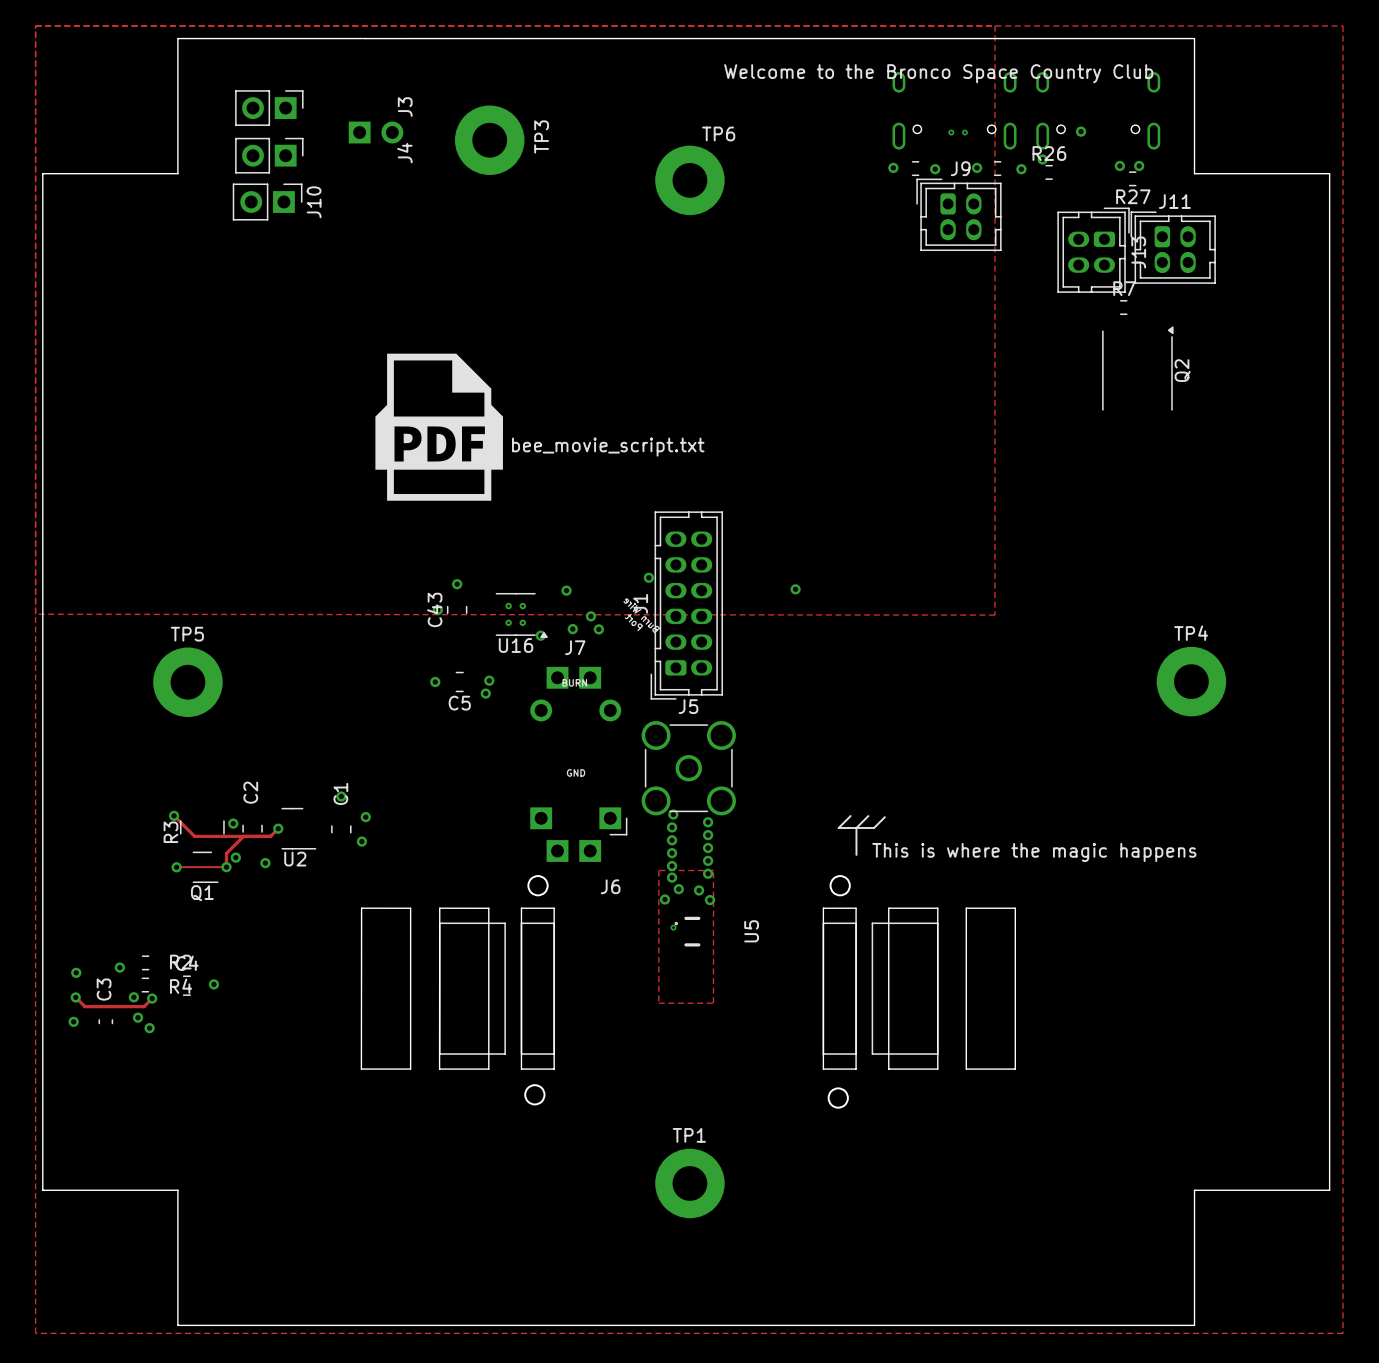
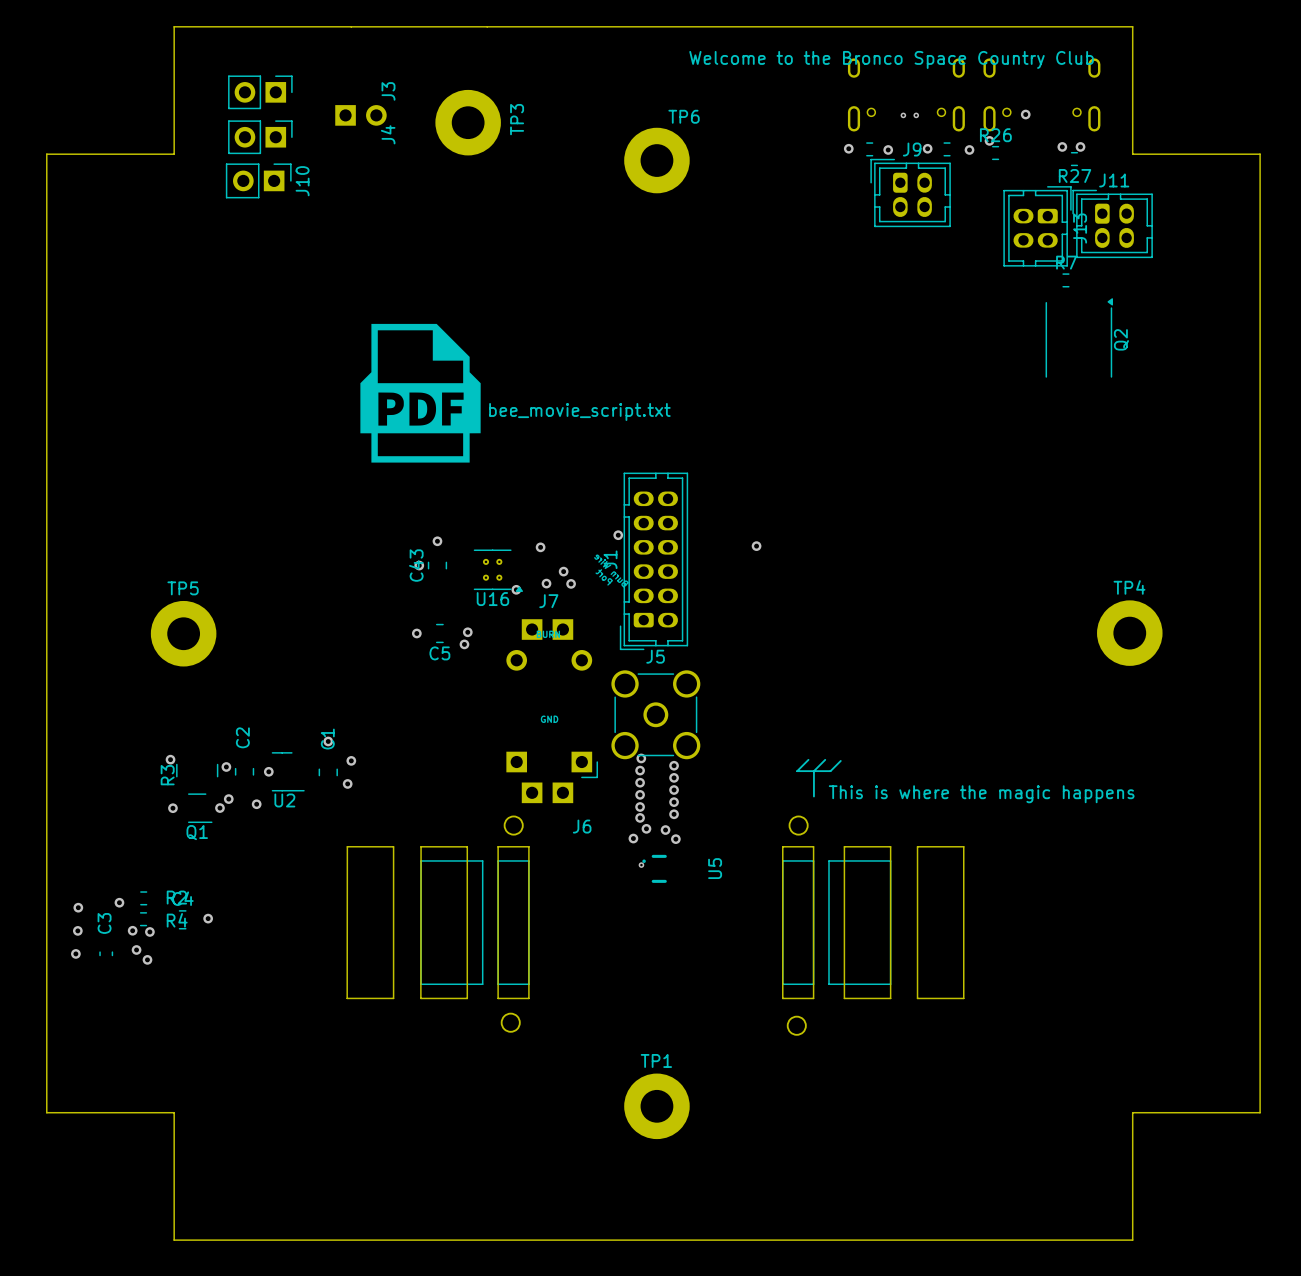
zone outline: (35, 25) (35, 1333) (1343, 1333) (1343, 25) (35, 25) -> none
zone outline: (35, 25) (995, 25) (995, 615) (35, 614) -> none
track: (174, 815) (194, 836) (270, 836) (278, 828) -> none
track: (243, 836) (226, 853) (226, 867) (176, 867) -> none
zone outline: (658, 870) (658, 1003) (713, 1003) (713, 870) (658, 870) -> none
track: (75, 997) (84, 1006) (144, 1006) (152, 998) -> none

